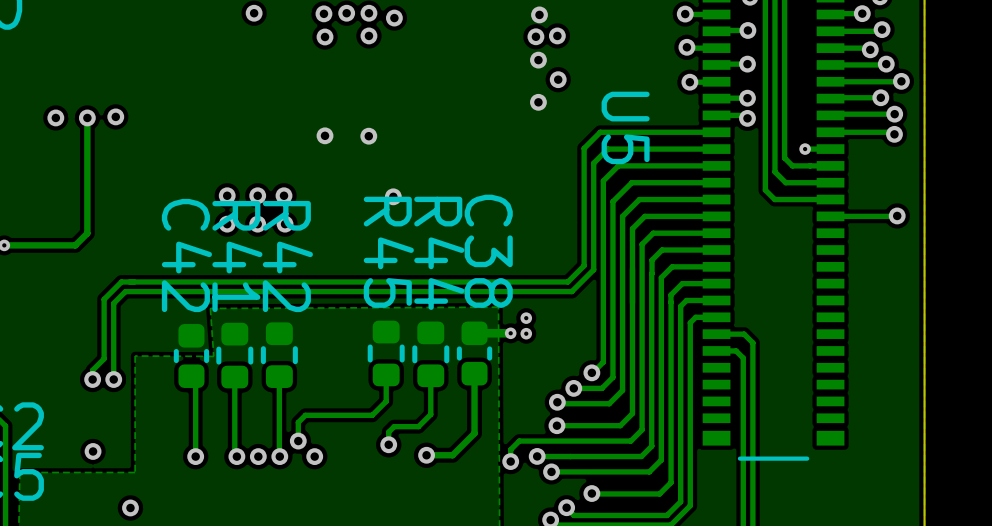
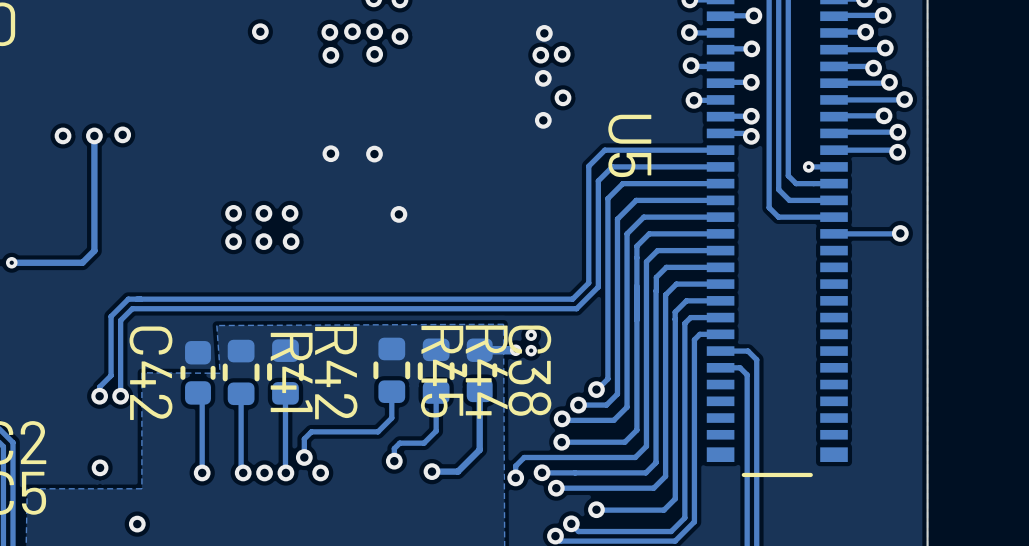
C38 name position: C38 (488, 251) -> C38 (529, 370)
R45 name position: R45 (388, 252) -> R45 (442, 371)
R44 name position: R44 (439, 253) -> R44 (486, 372)
C42 name position: C42 (186, 255) -> C42 (150, 373)
R41 name position: R41 (237, 256) -> R41 (291, 372)
R42 name position: R42 (287, 256) -> R42 (336, 373)

